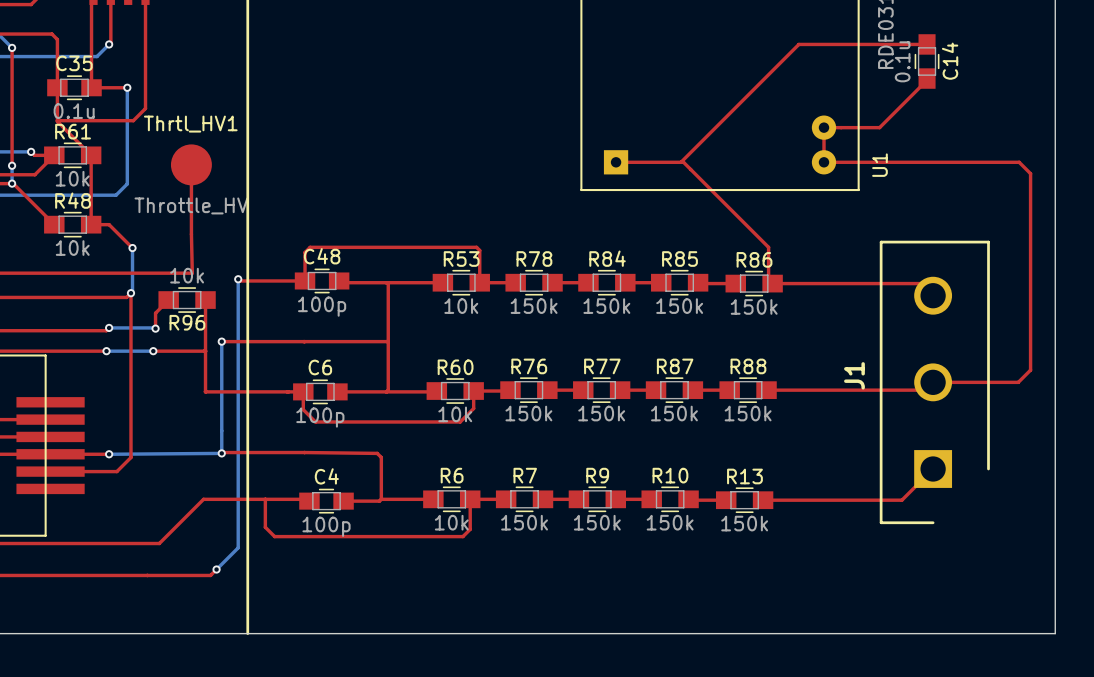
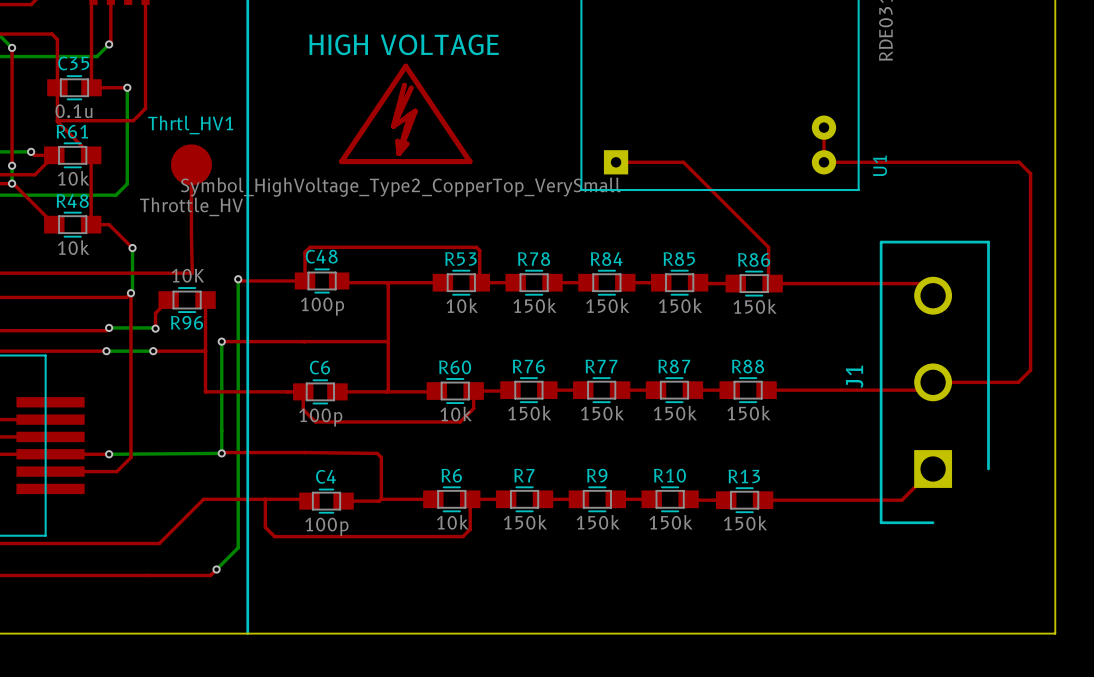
top track: (927, 44) (798, 44) (681, 162) -> none
C14: 0.1u (927, 61) -> none
top track: (927, 78) (879, 127) (824, 127) -> none
HIGH VOLTAGE: none -> Symbol_HighVoltage_Type2_CopperTop_VerySmall (405, 113)
R96 value: 10k (187, 275) -> 10K (187, 275)

